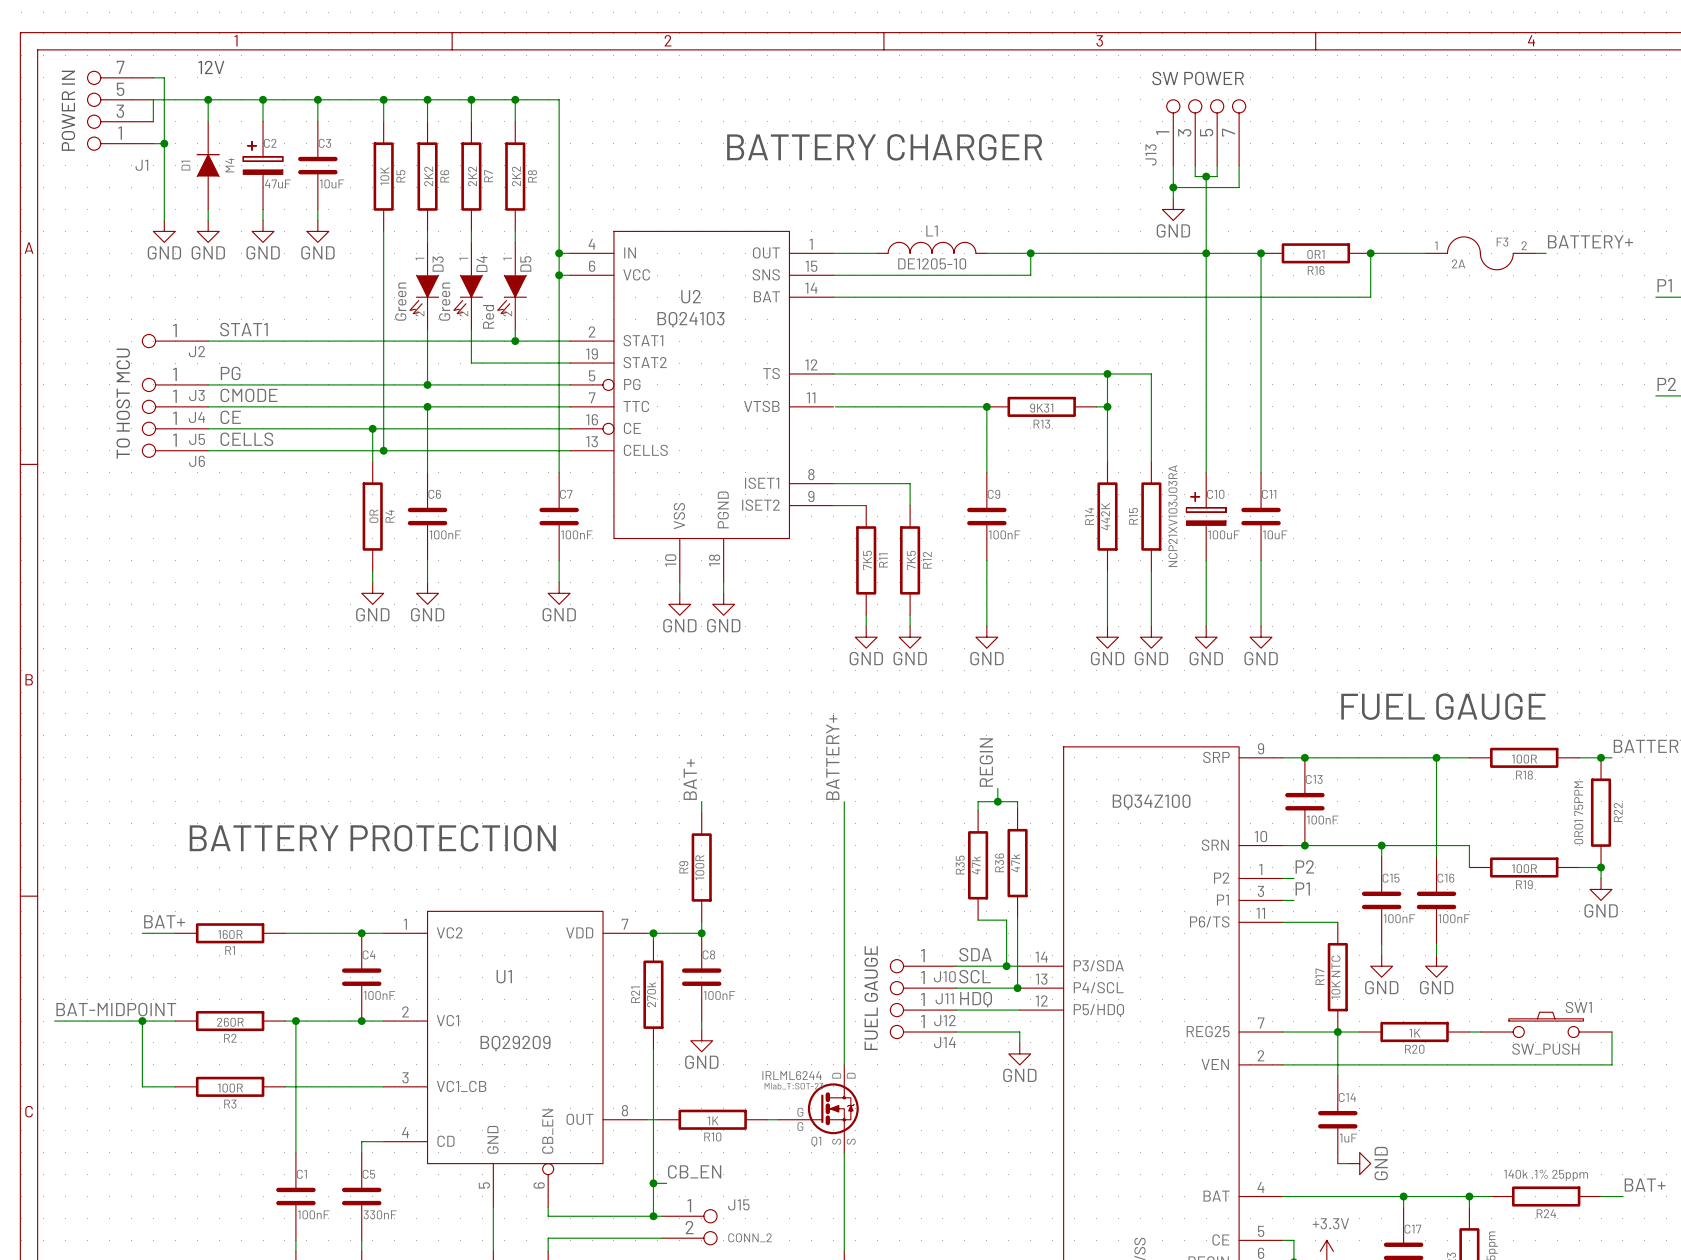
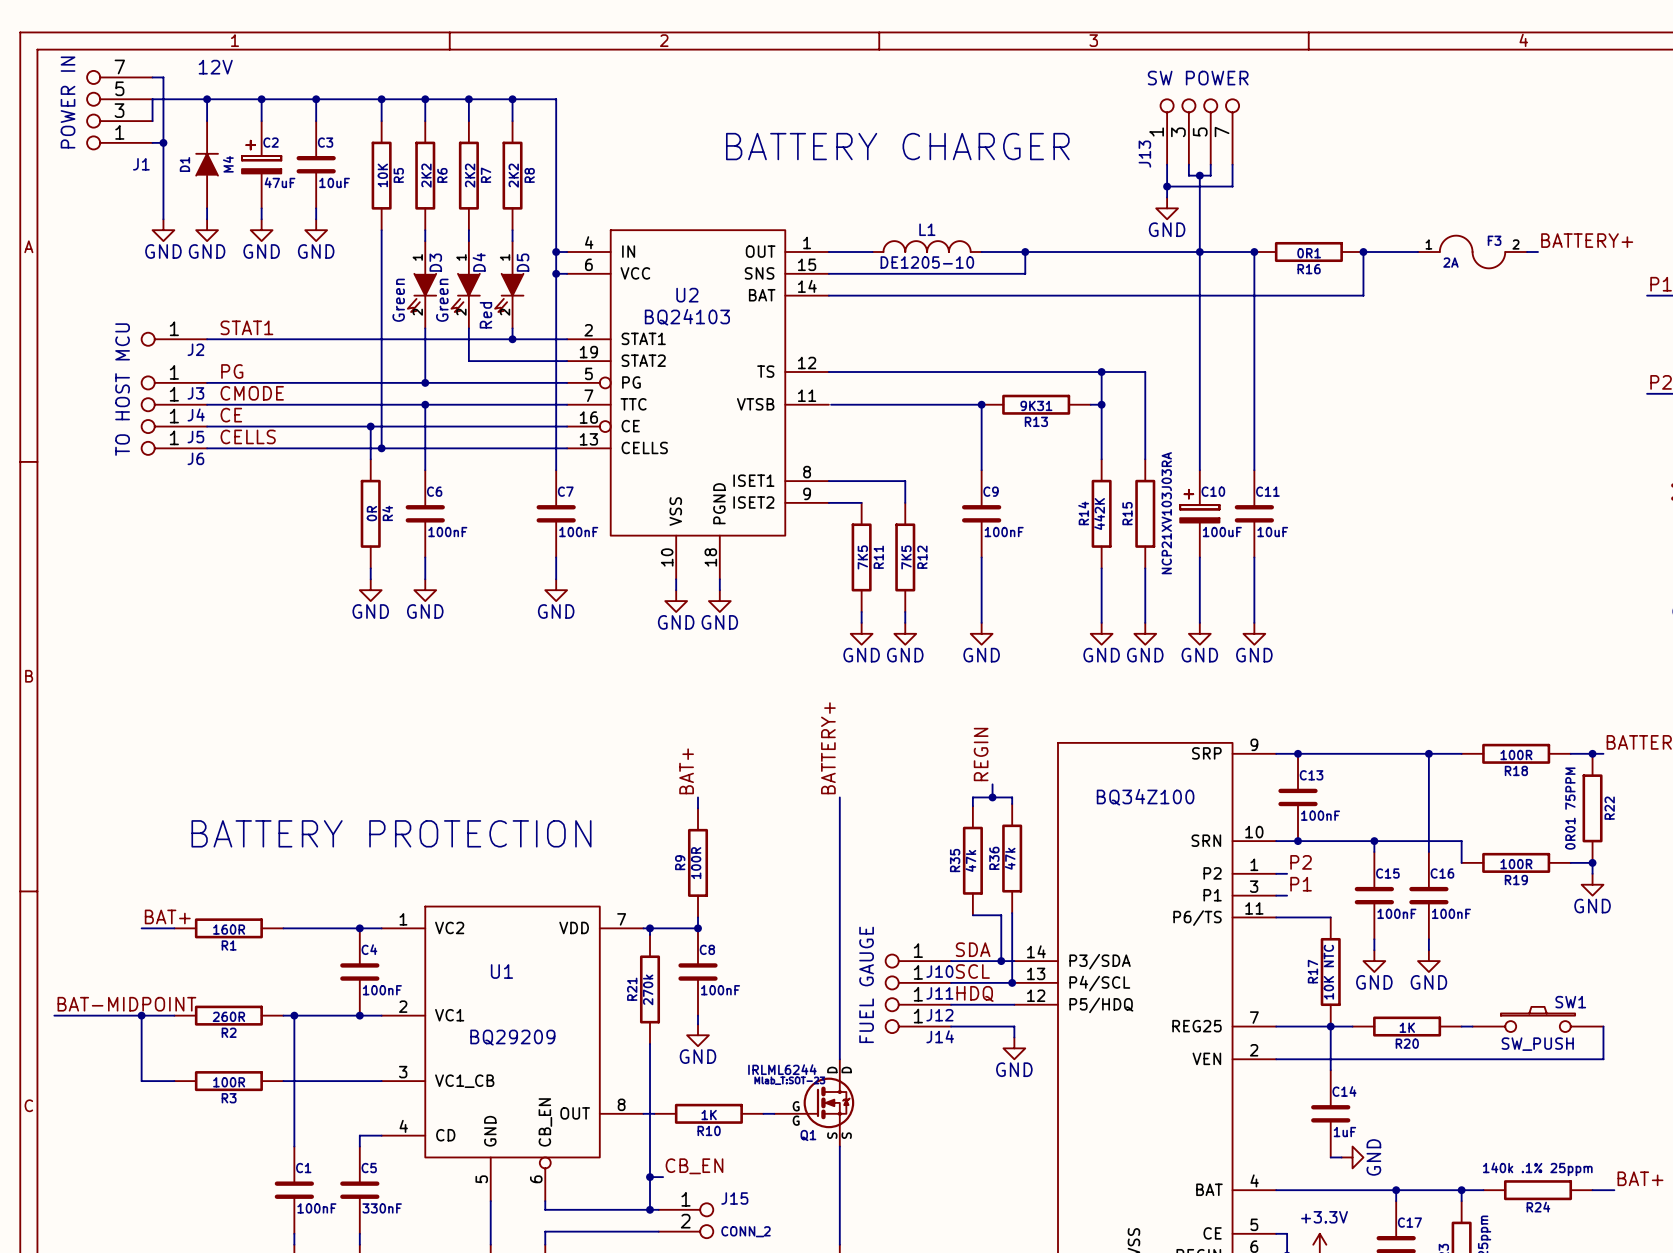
text: FUEL GAUGE (1443, 706) -> none

